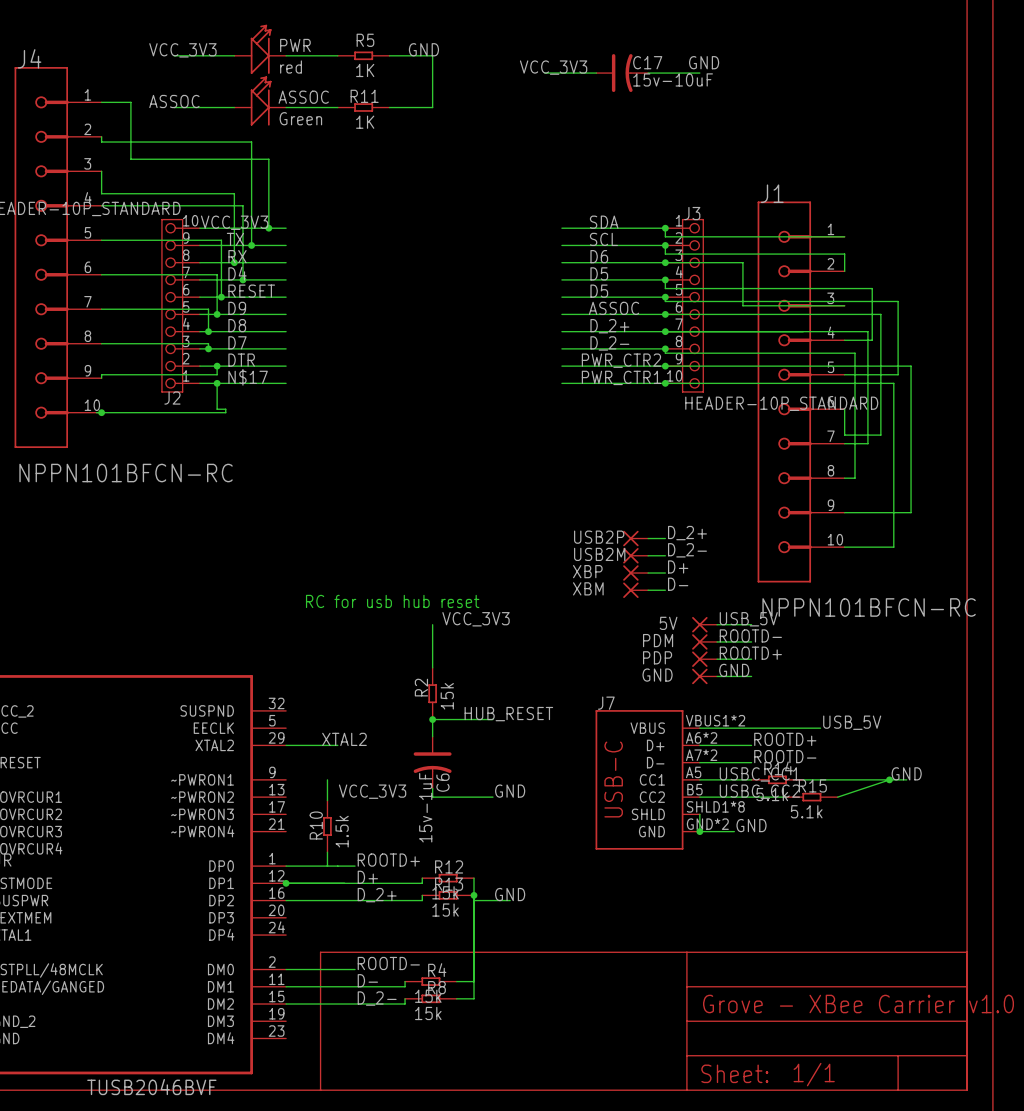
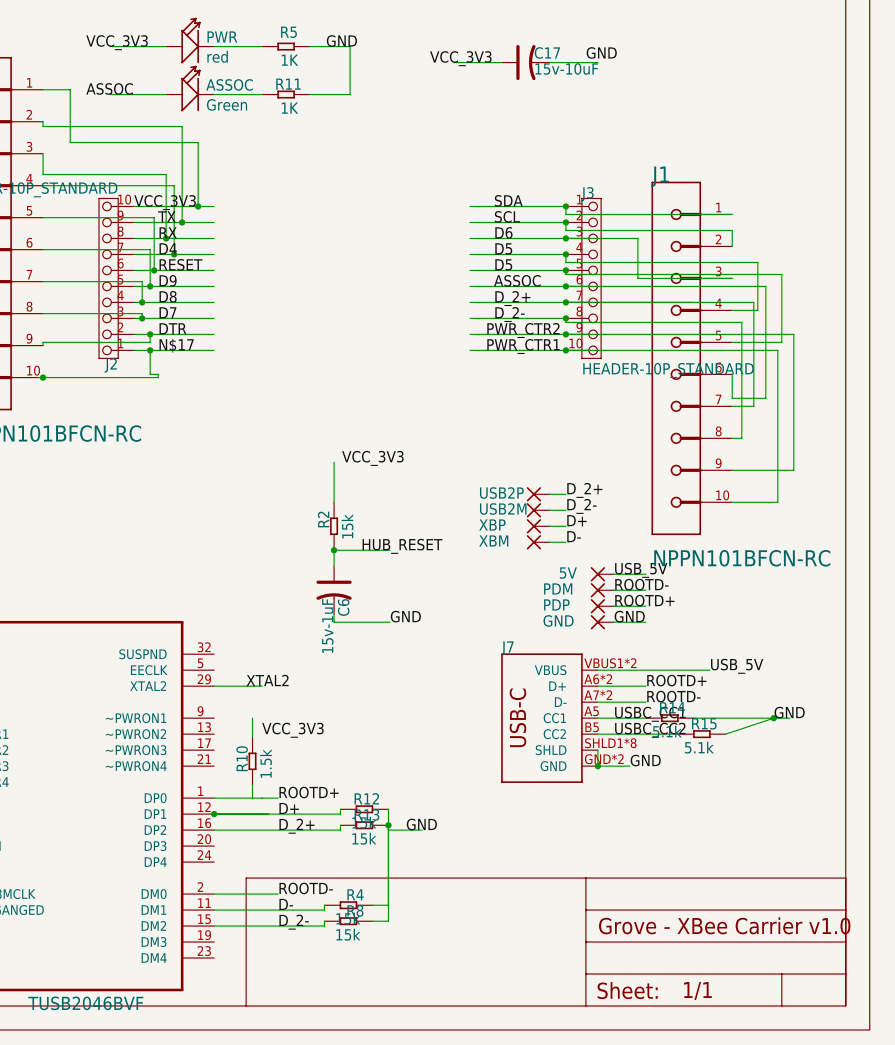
junction: none -> (334, 550)
text: RC for usb hub reset (392, 601) -> none
label position: VCC_3V3 (476, 619) -> VCC_3V3 (372, 458)
wire: (432, 624) (432, 667) -> (334, 462) (334, 502)
R2 position: (432, 693) -> (334, 526)
label position: HUB_RESET (508, 714) -> HUB_RESET (402, 546)
junction: (432, 719) -> none
wire: (492, 719) (432, 719) (432, 736) -> (390, 550) (334, 550) (334, 566)
C6 position: (432, 762) -> (334, 590)
wire: (432, 788) (432, 797) (492, 797) -> (334, 614) (334, 622) (390, 622)
label position: GND (510, 791) -> GND (405, 616)

